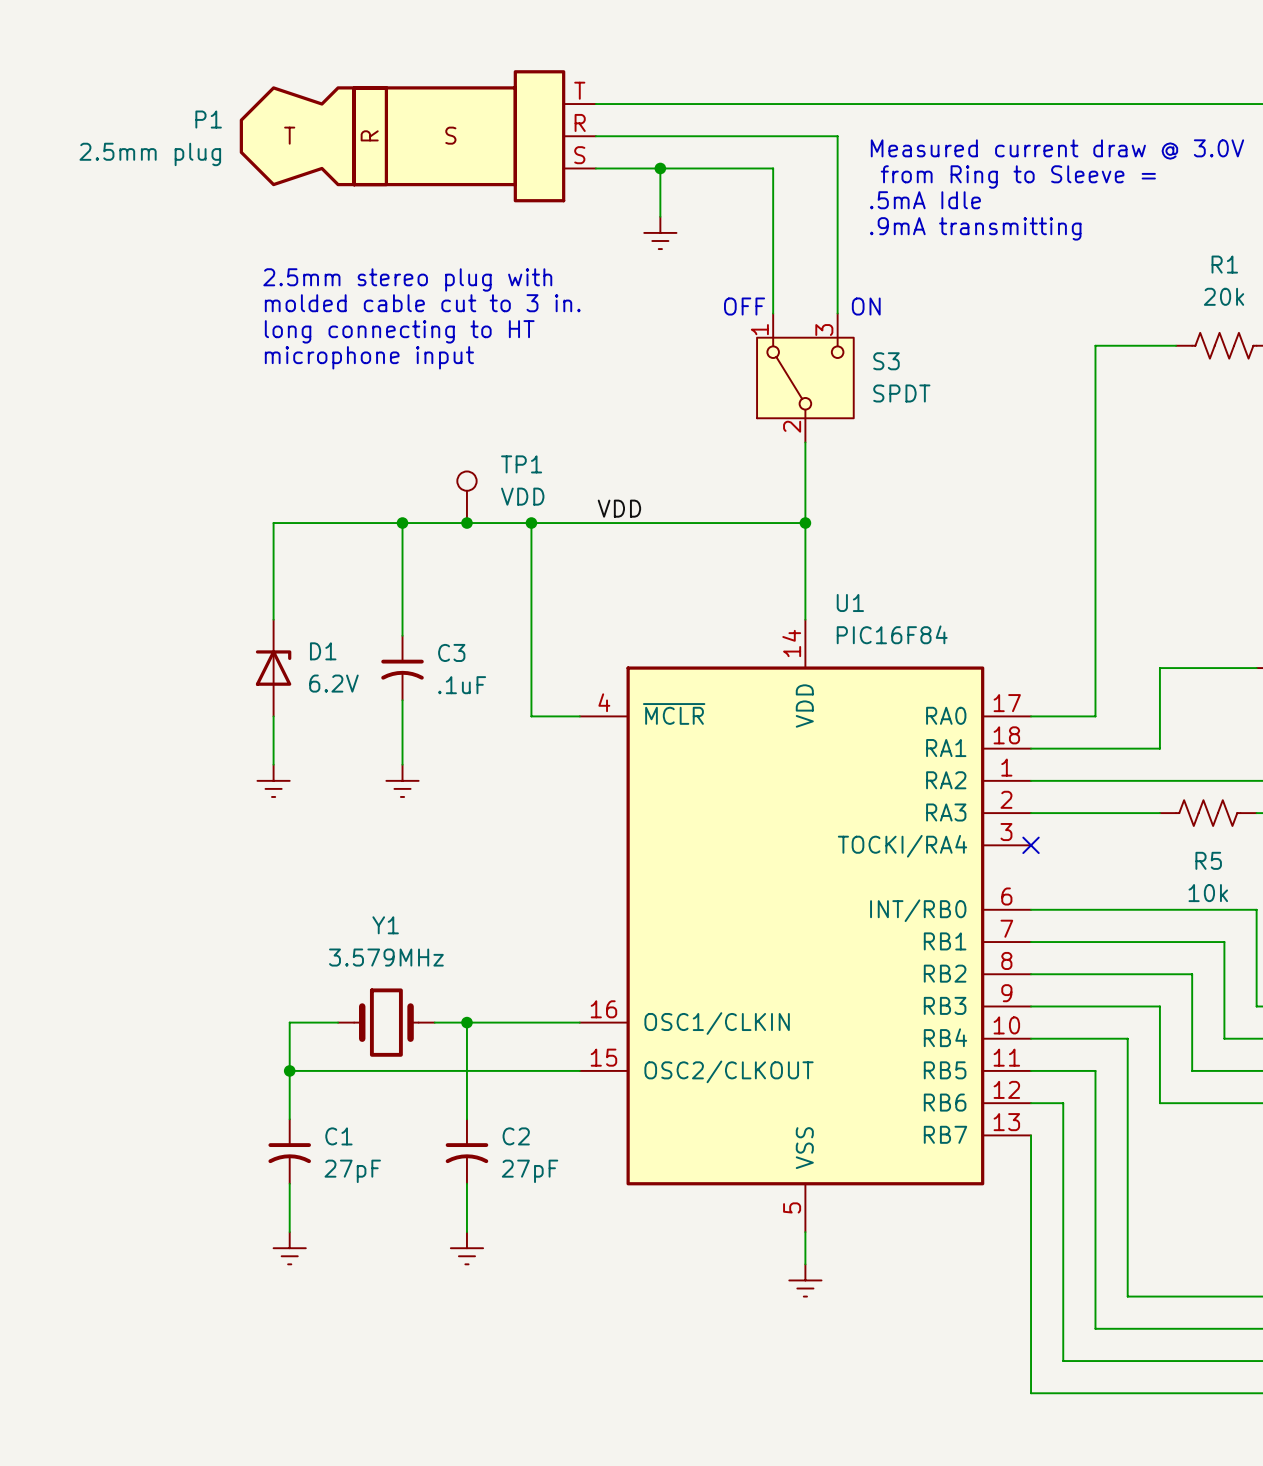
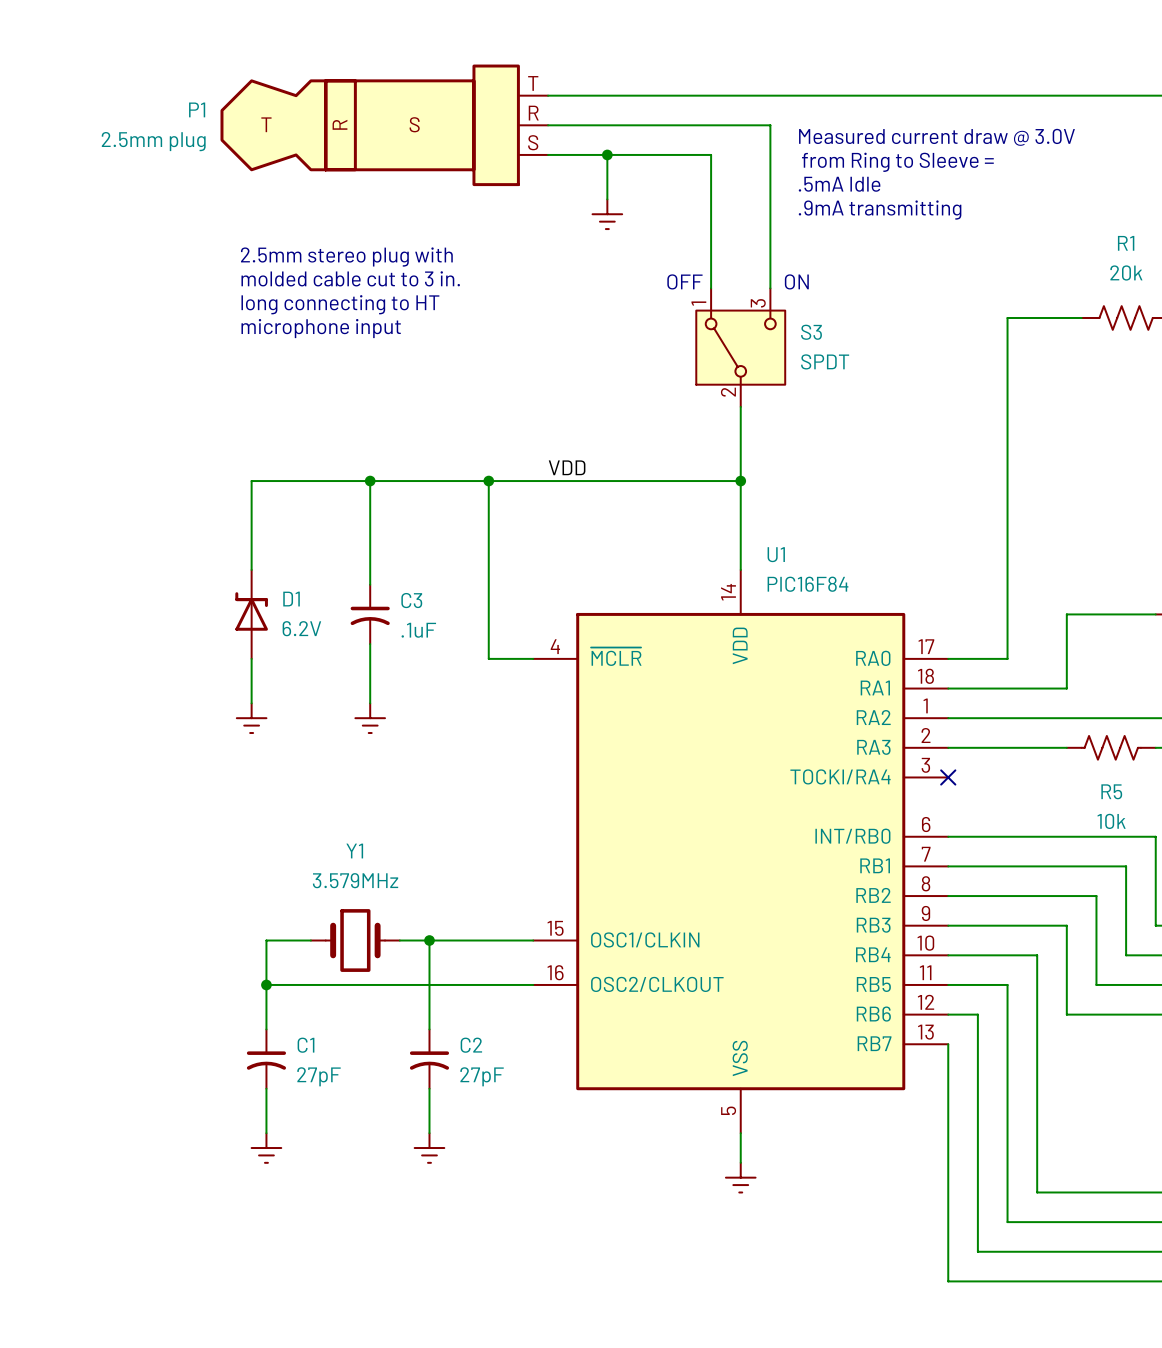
TP1: VDD (466, 497) -> none
junction: (466, 523) -> none
D1 symbol: [255, 619, 292, 717] -> [235, 569, 268, 659]
U1 pin number: 16 (603, 1009) -> 15 (555, 928)
U1 pin number: 15 (603, 1057) -> 16 (555, 972)

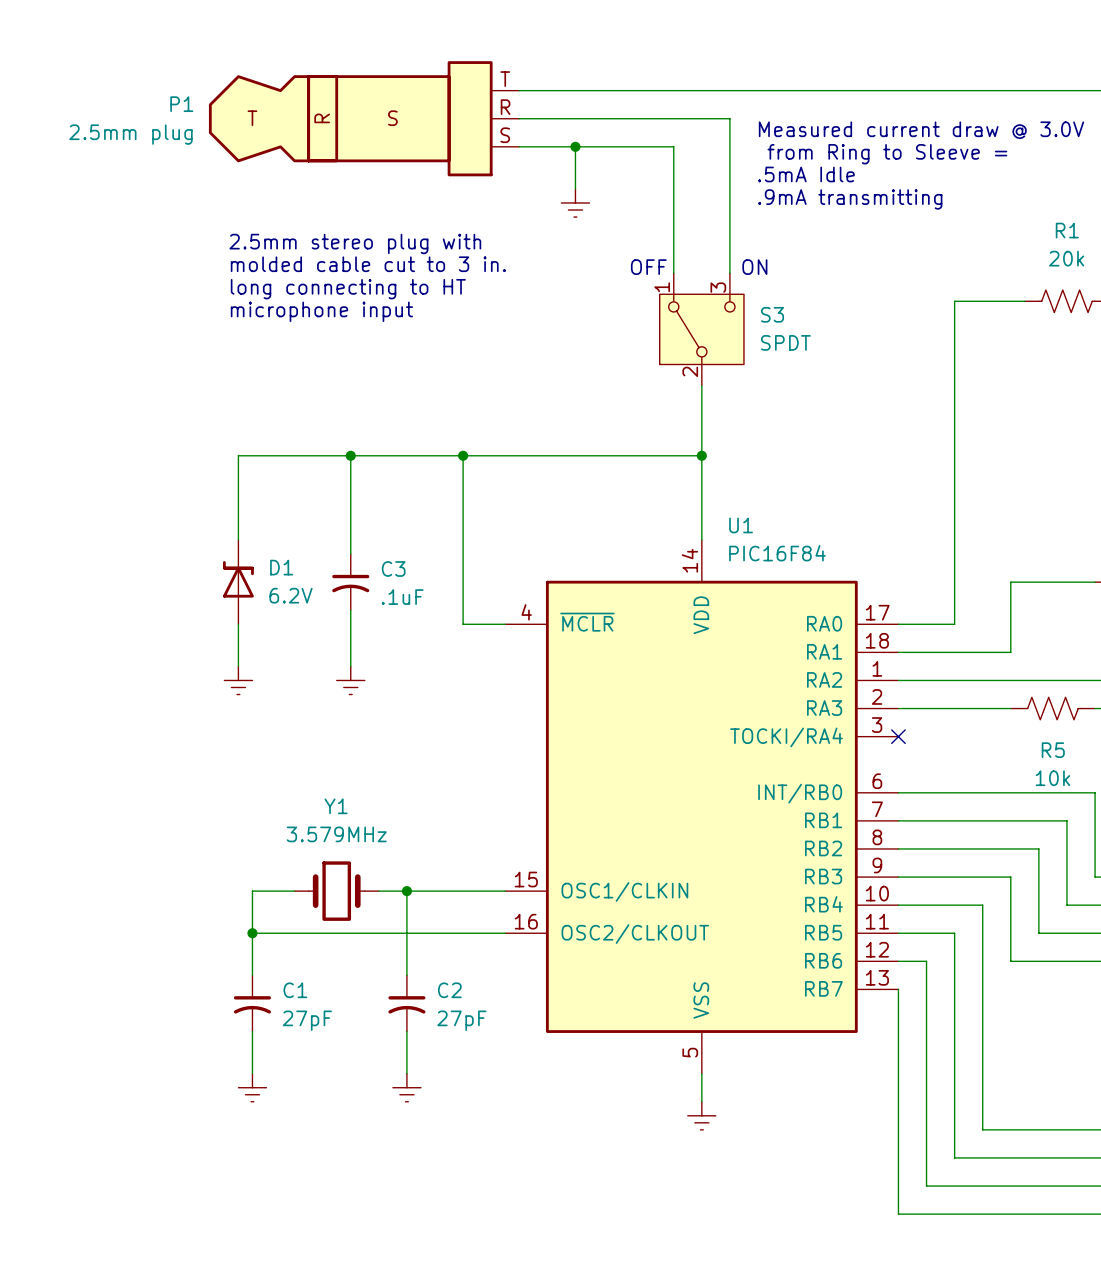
label: VDD (567, 467) -> none

